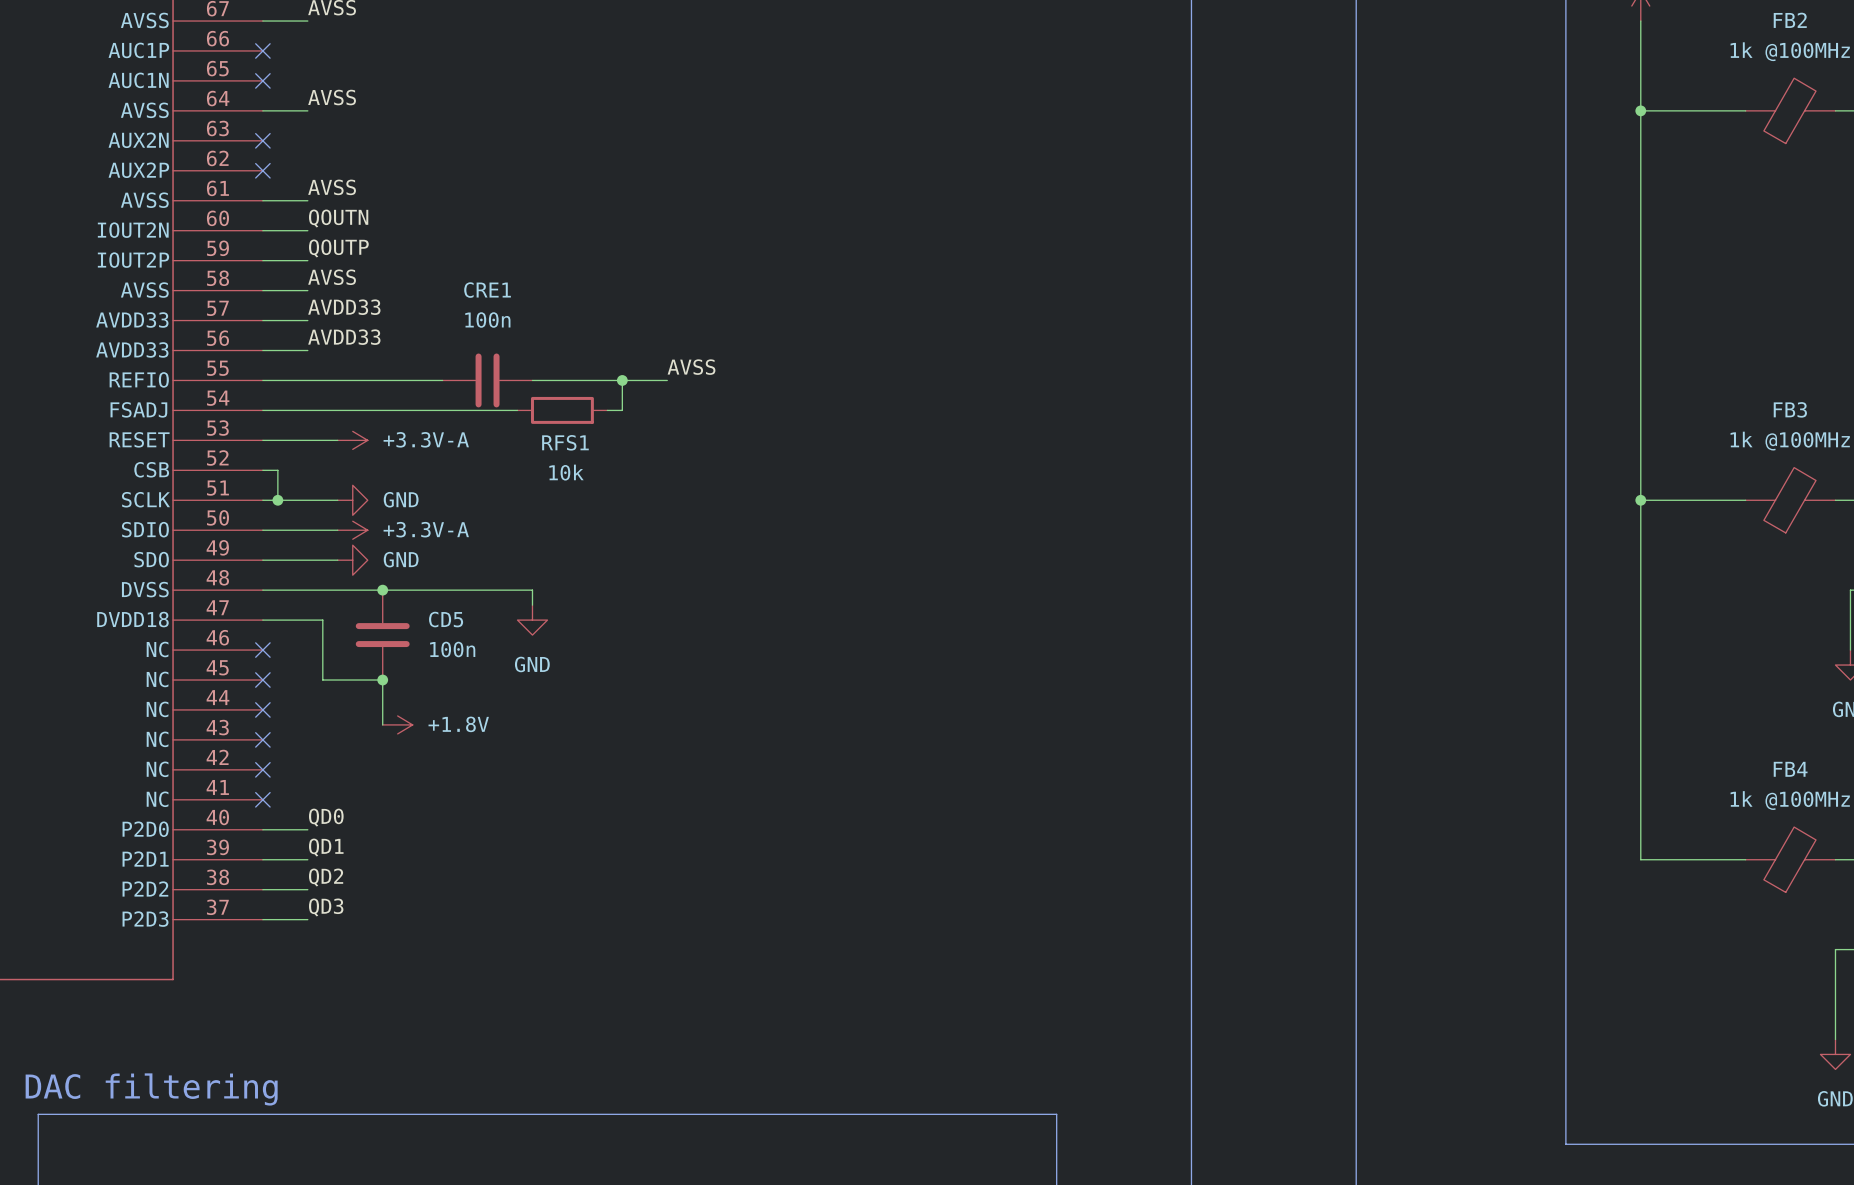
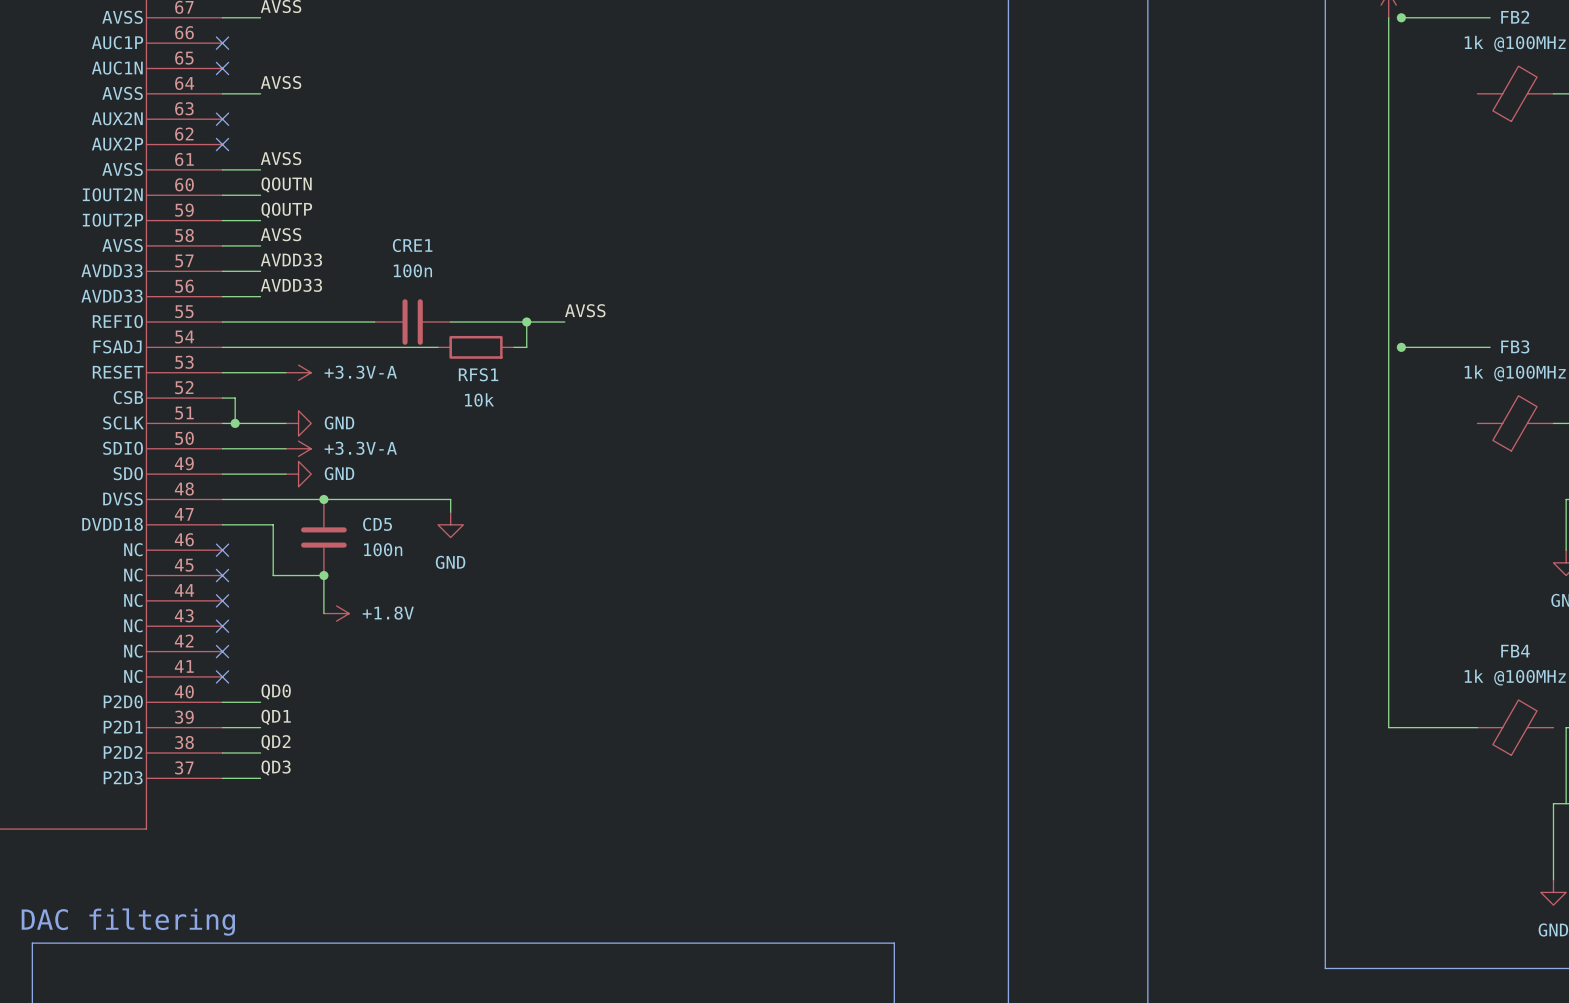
junction: none -> (1401, 17)
wire: (1640, 110) (1745, 110) -> (1401, 17) (1490, 17)
junction: (1640, 110) -> none
junction: none -> (1401, 347)
wire: (1640, 500) (1745, 500) -> (1401, 347) (1490, 347)
junction: (1640, 500) -> none
wire: (1835, 859) (1850, 859) -> (1566, 803) (1566, 727)

